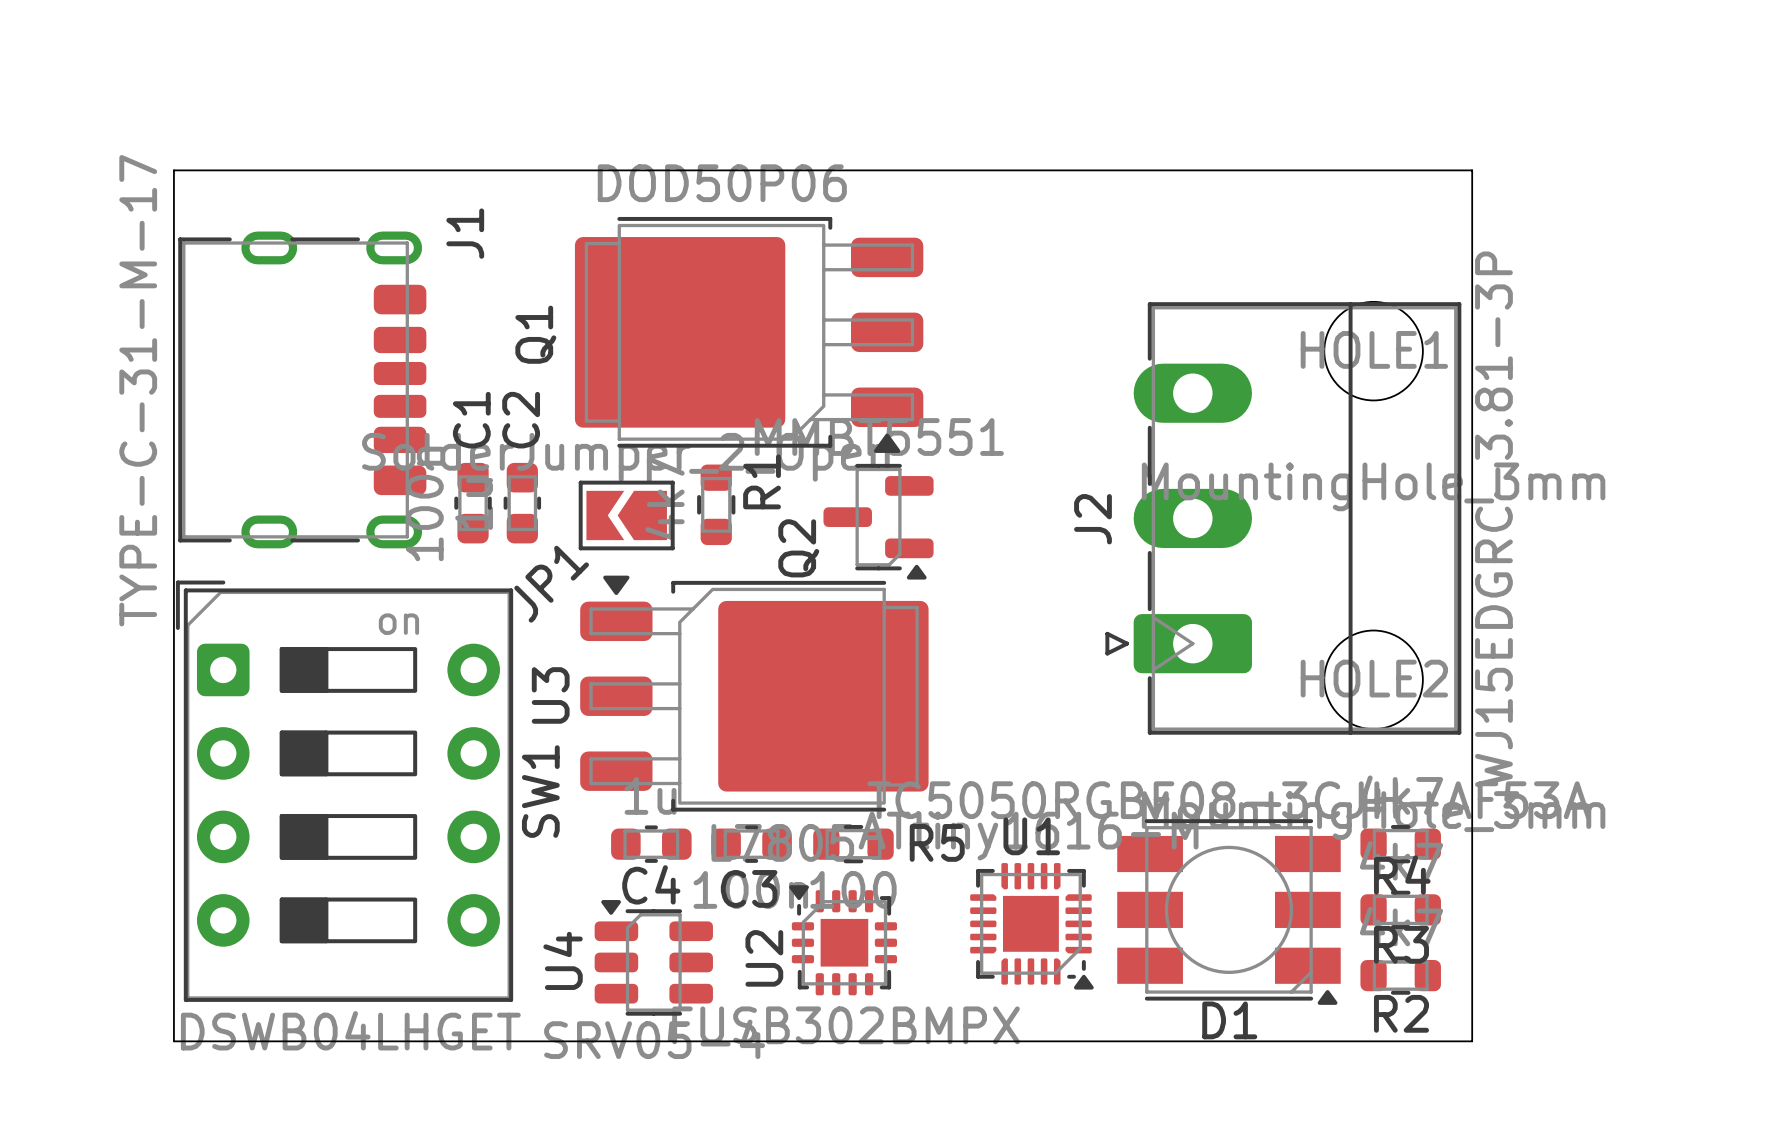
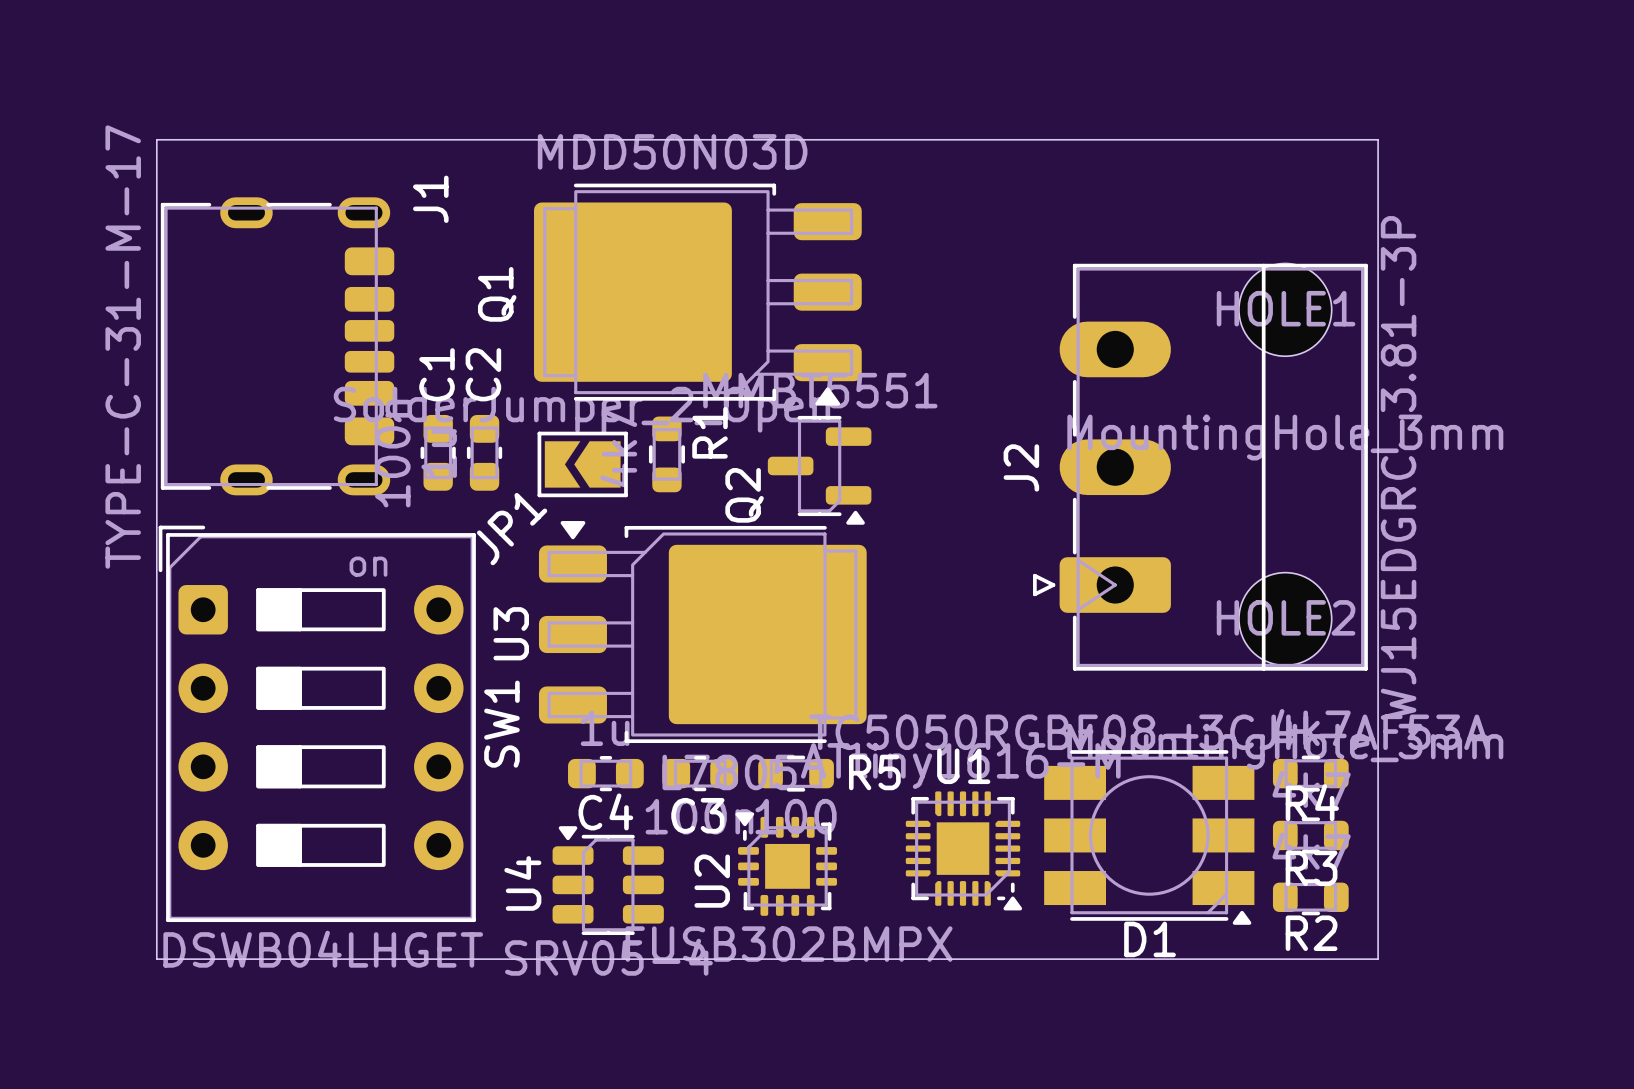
Q1 value: DOD50P06 (722, 183) -> MDD50N03D (672, 151)

